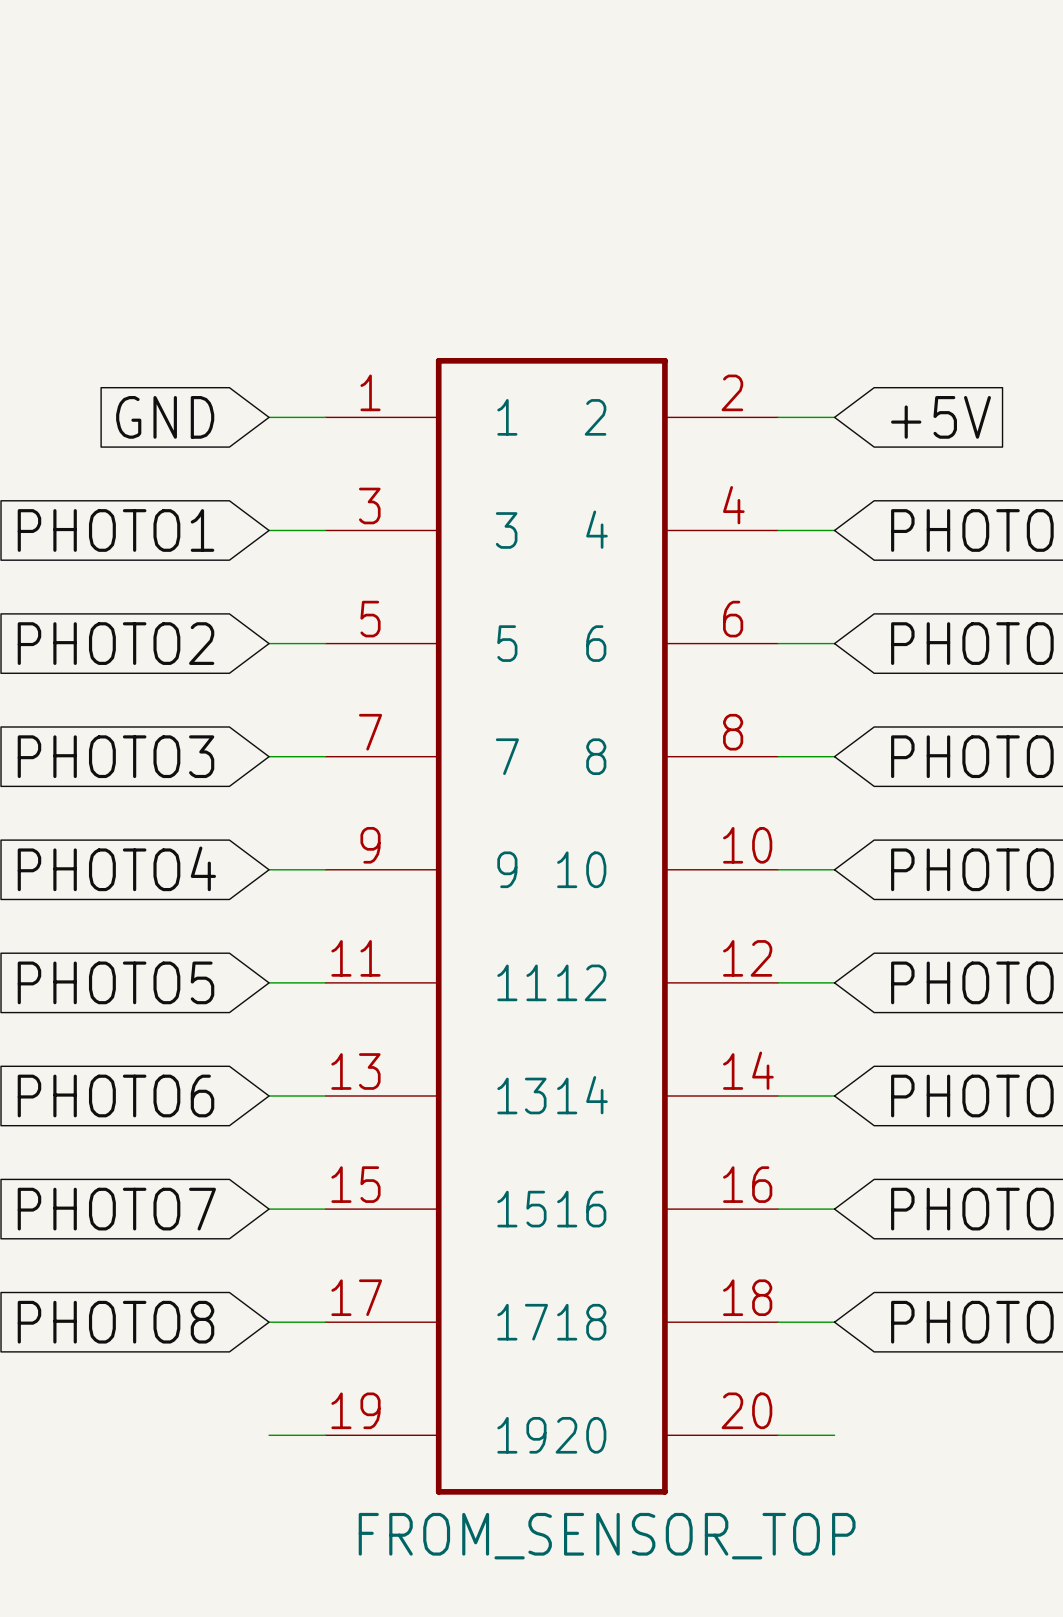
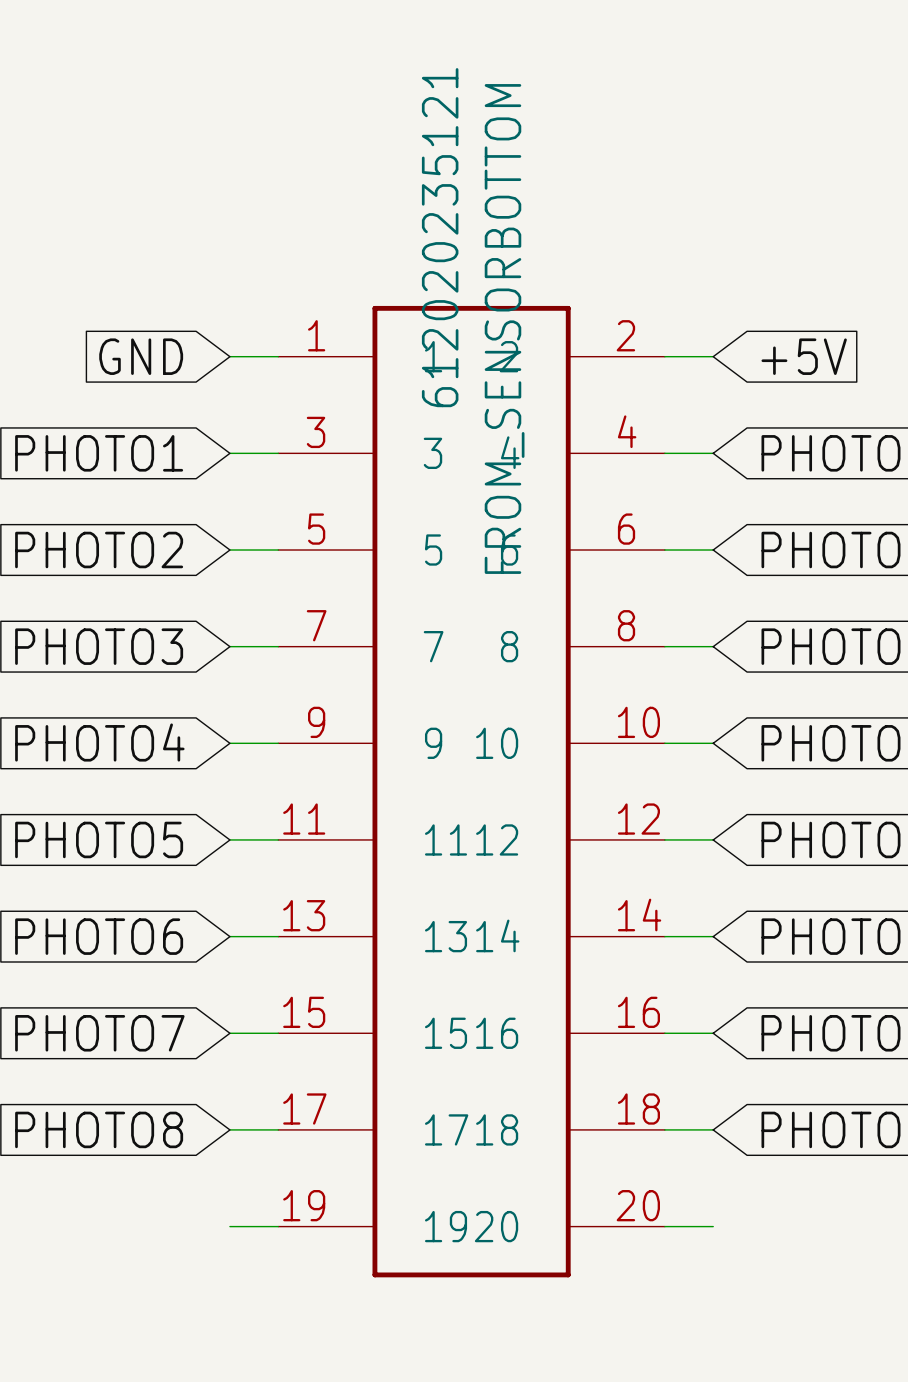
FROM_SENSOR_TOP value: none -> 612020235121 (440, 237)
FROM_SENSOR_TOP name: FROM_SENSOR_TOP (607, 1536) -> FROM_SENSORBOTTOM (504, 328)

